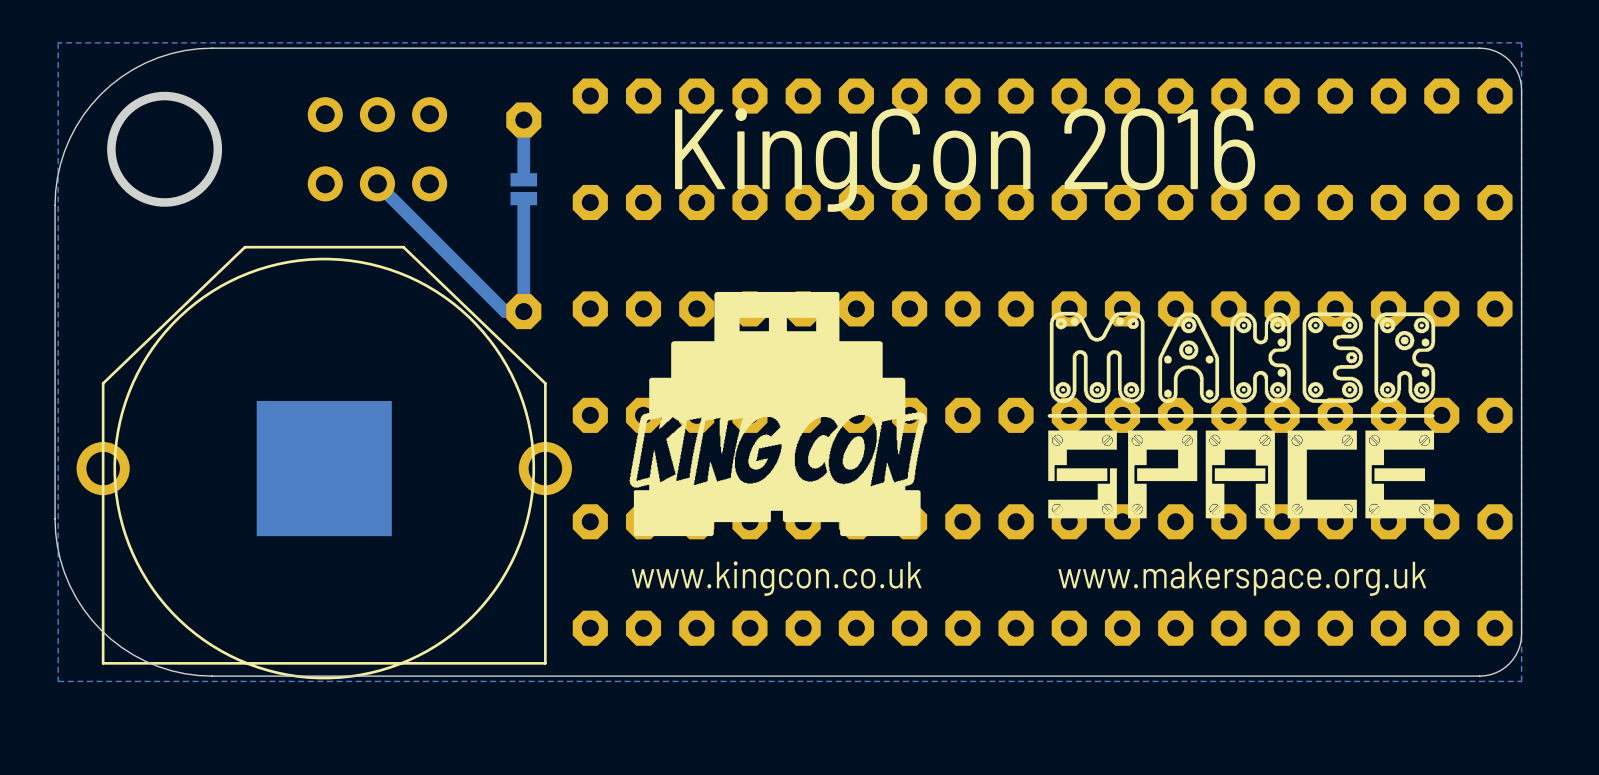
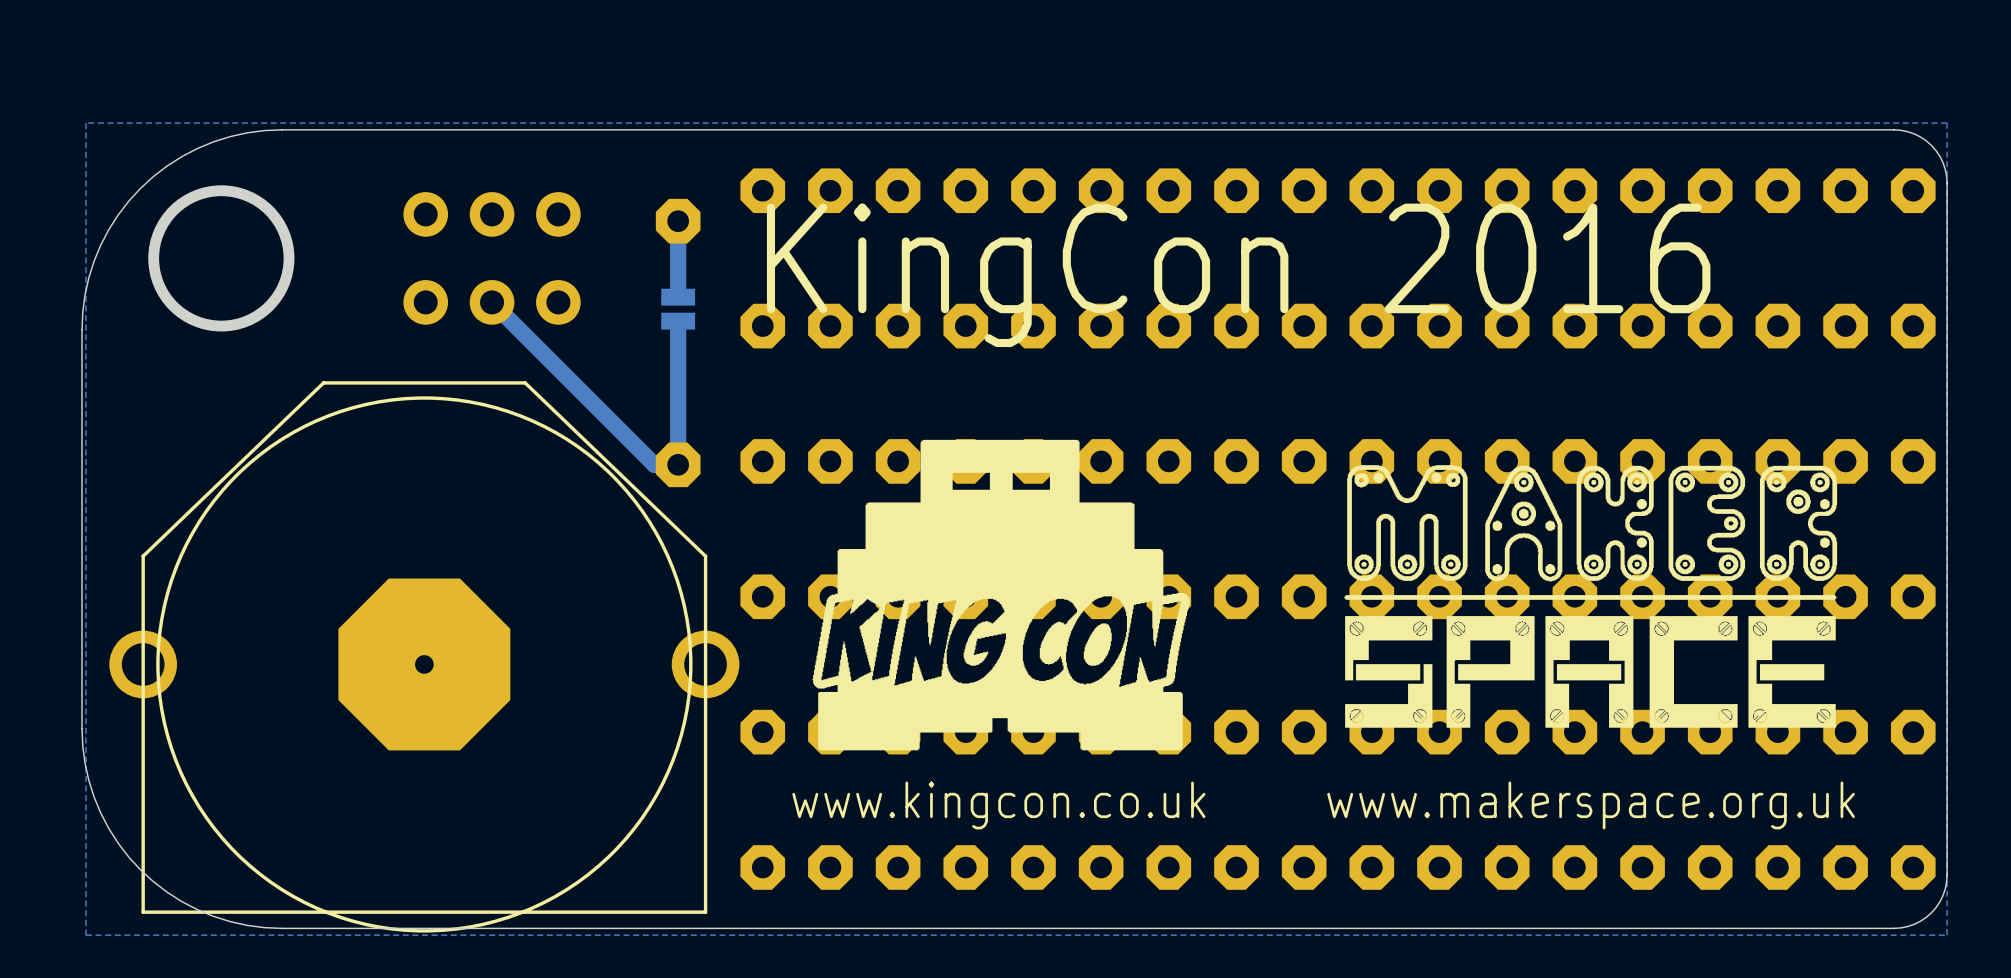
part footprint: [76, 245, 572, 680] -> [109, 381, 740, 933]

